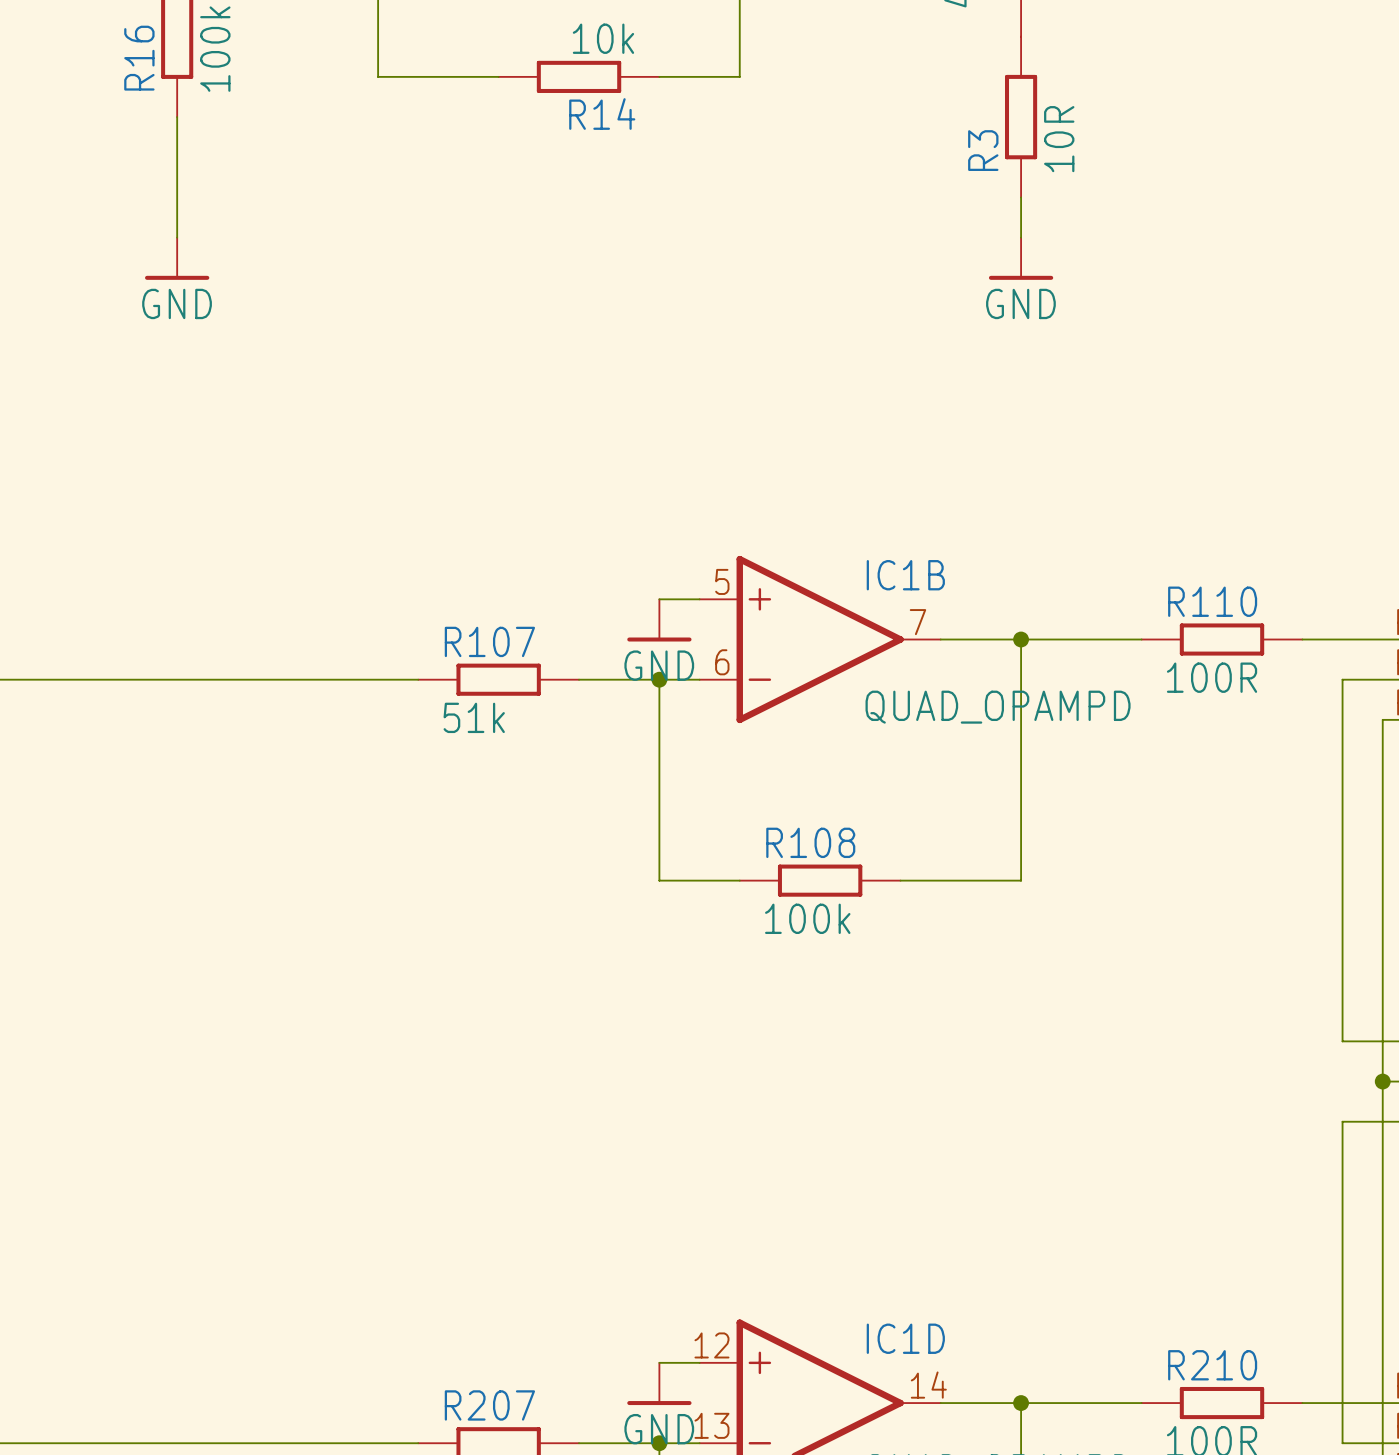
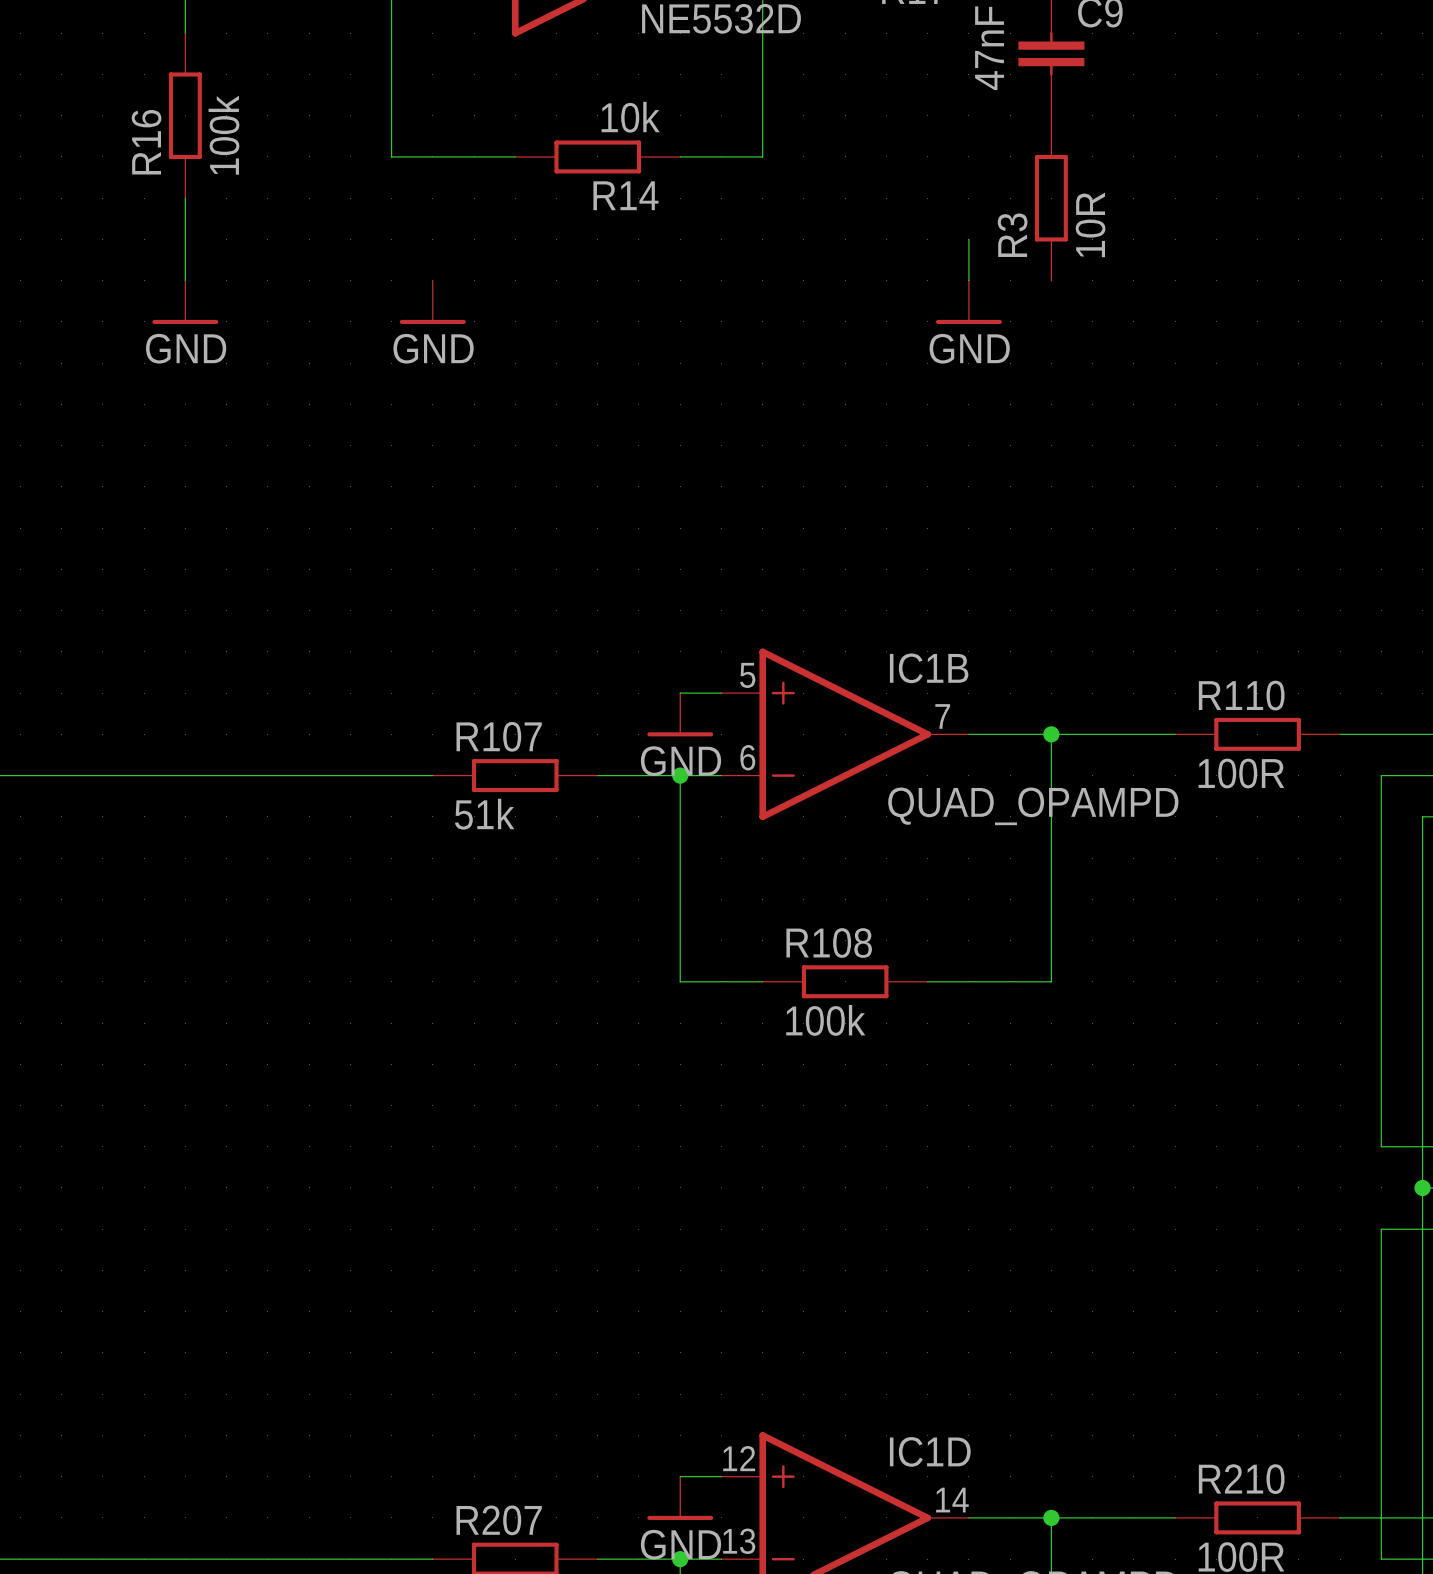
wire: (1021, 197) (1021, 237) -> (968, 239) (968, 280)
power symbol: none -> GND (432, 302)
power symbol position: GND (177, 258) -> GND (185, 302)
power symbol position: GND (1021, 258) -> GND (968, 302)

